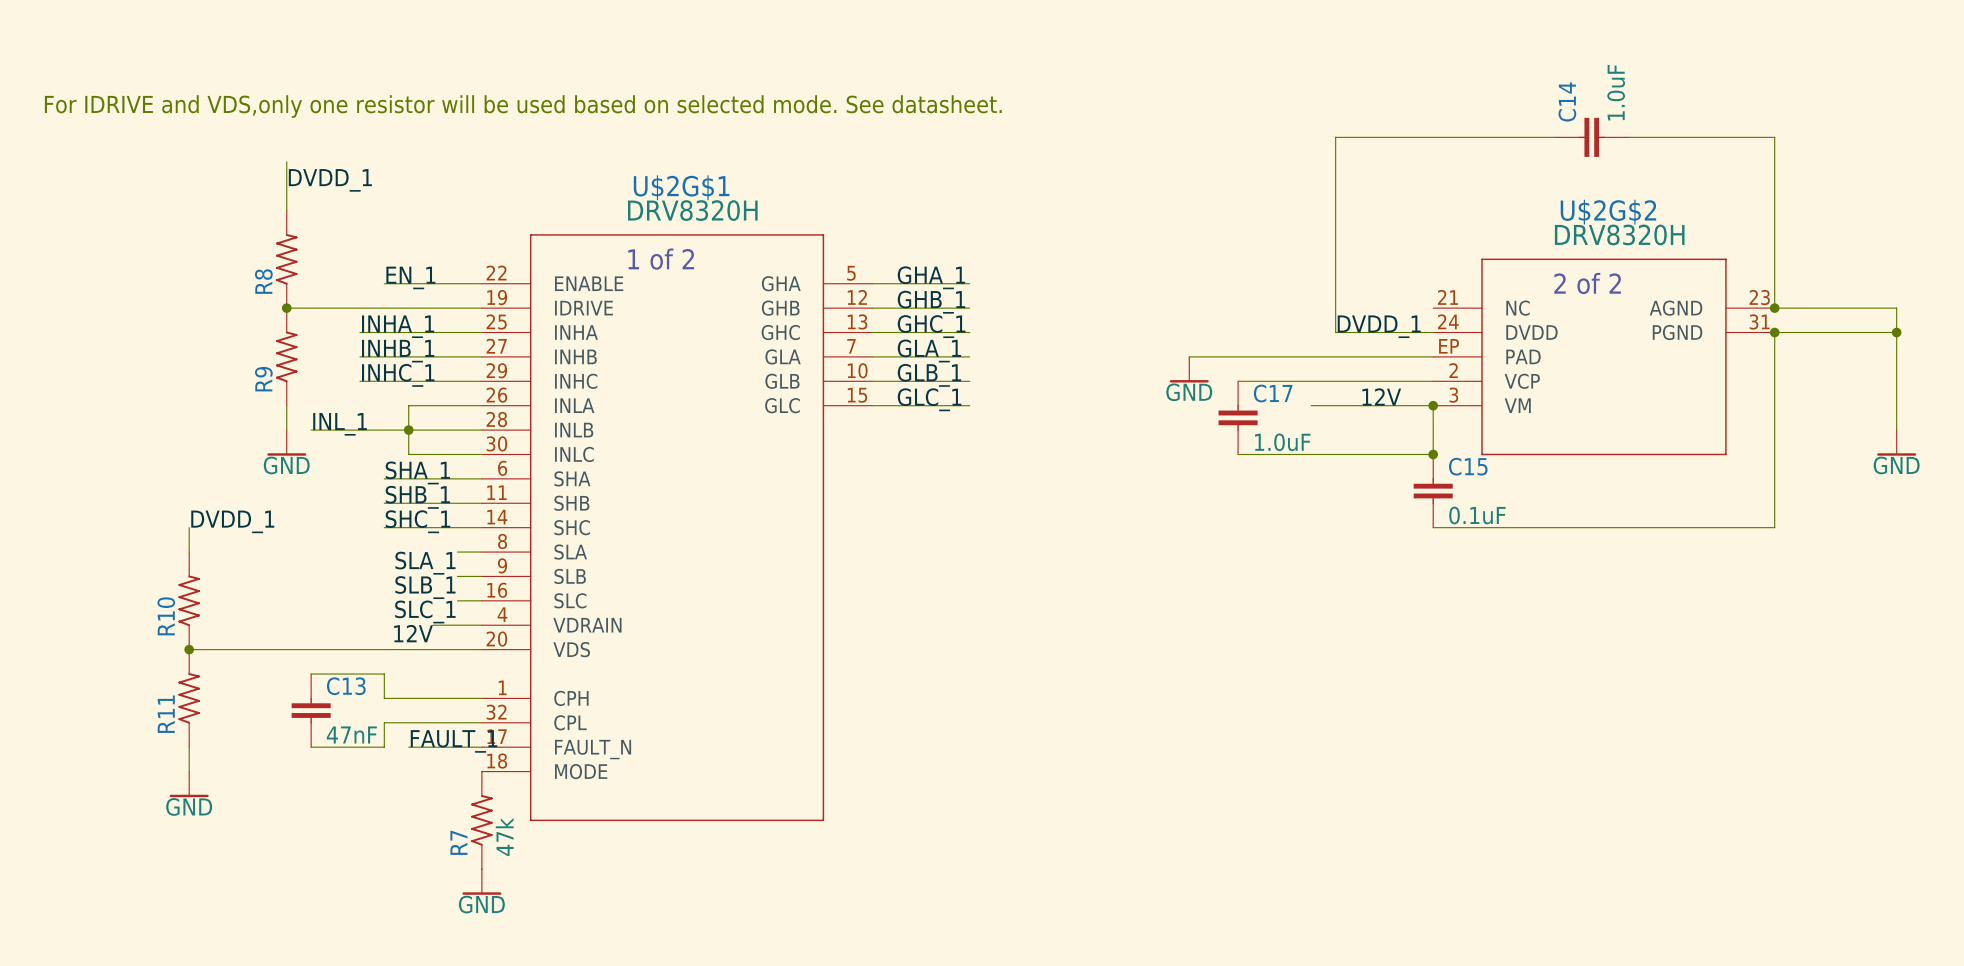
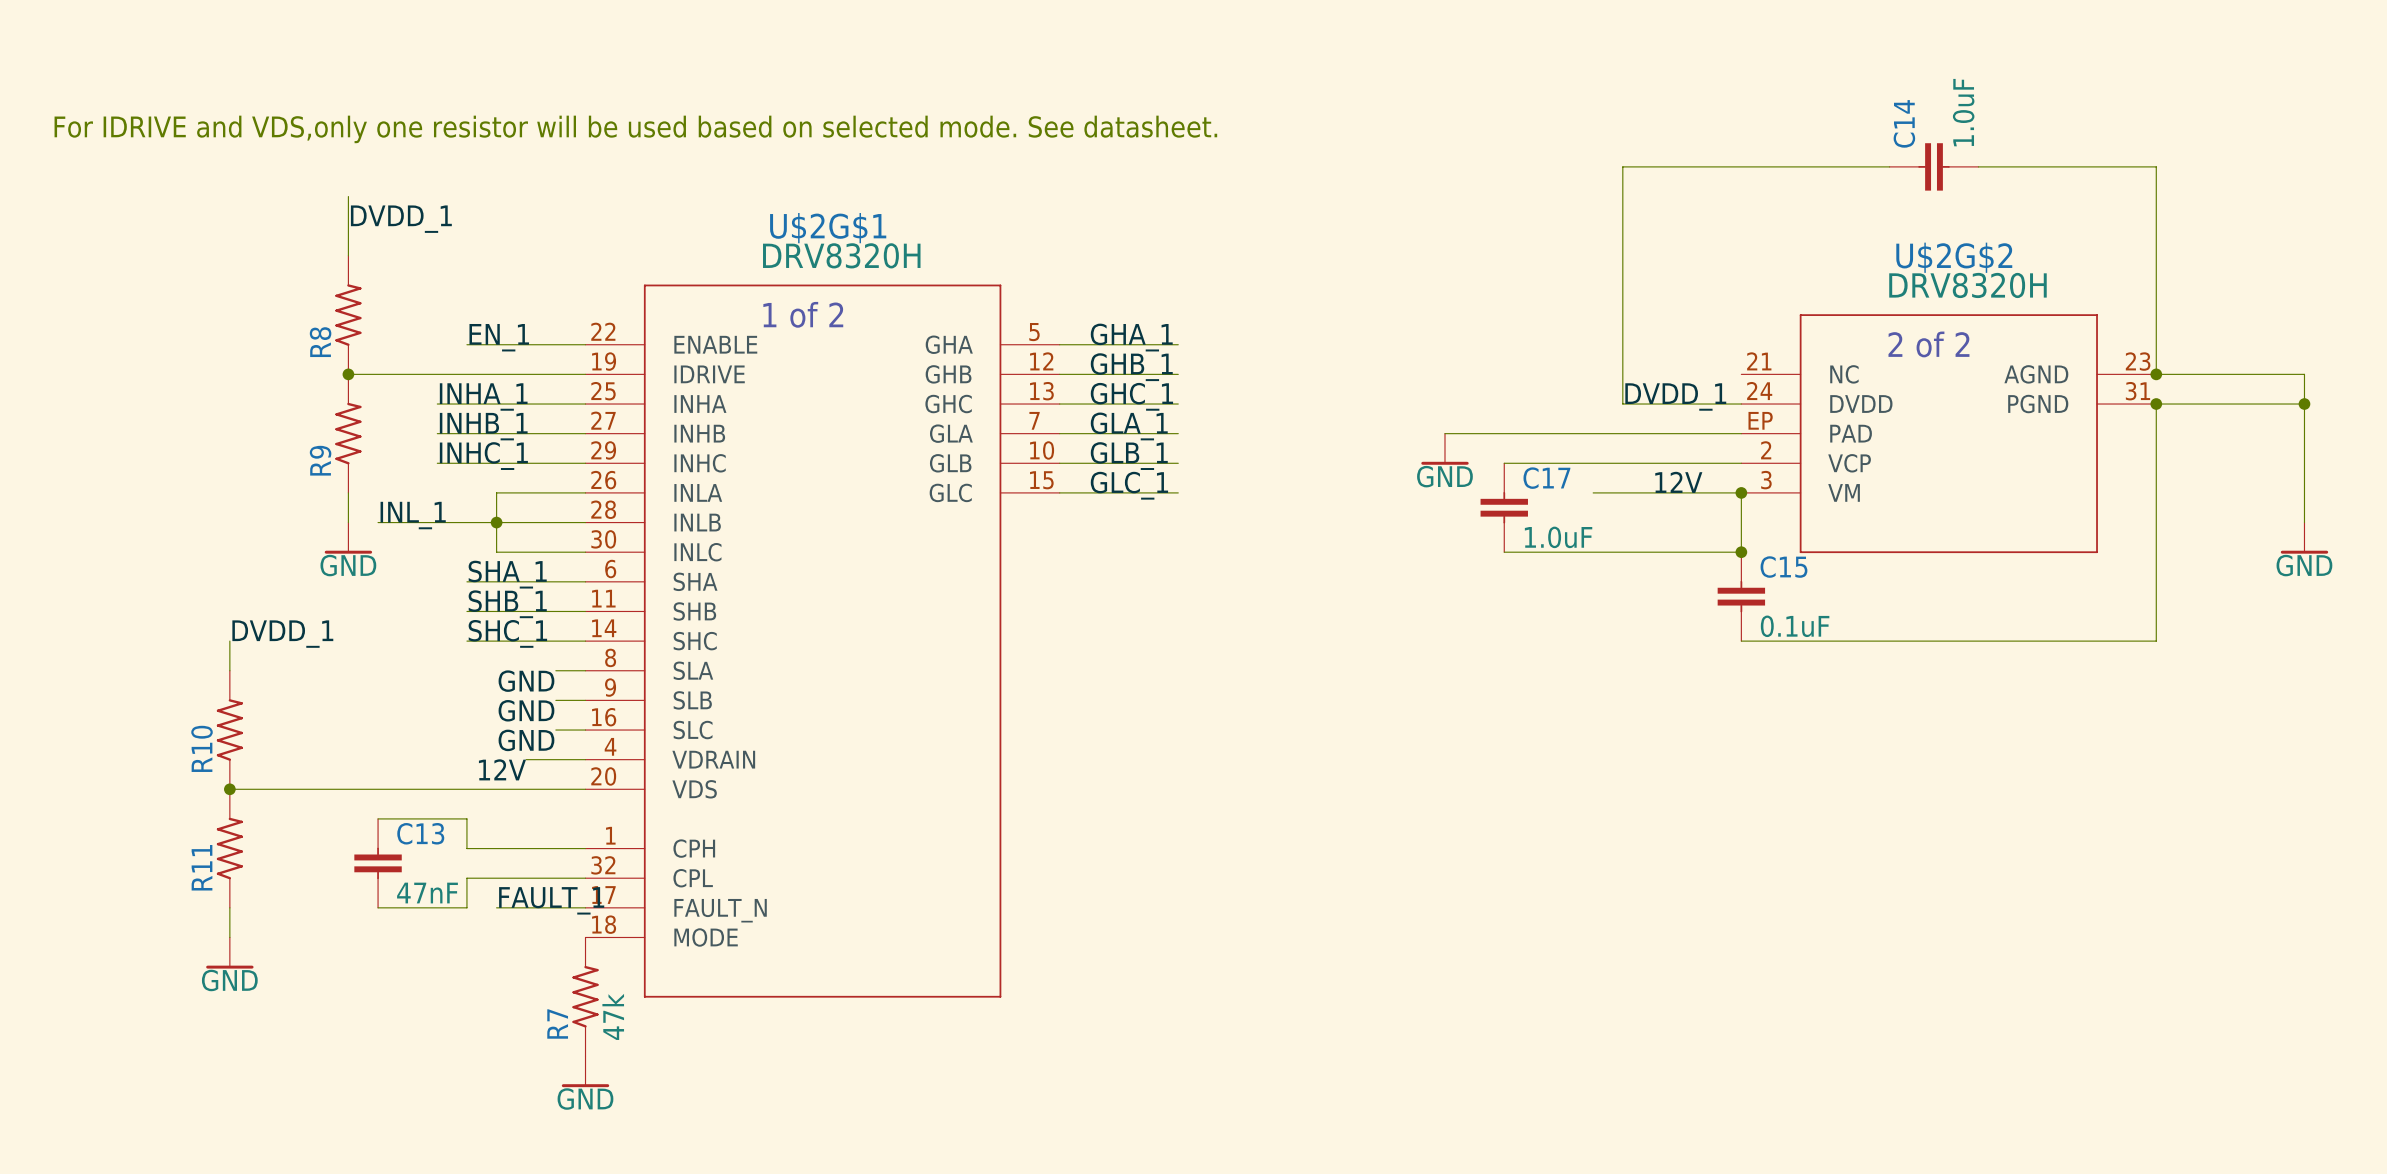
label: SLA_1 (425, 563) -> GND (526, 681)
label: SLB_1 (425, 587) -> GND (526, 710)
label: SLC_1 (425, 611) -> GND (526, 740)

